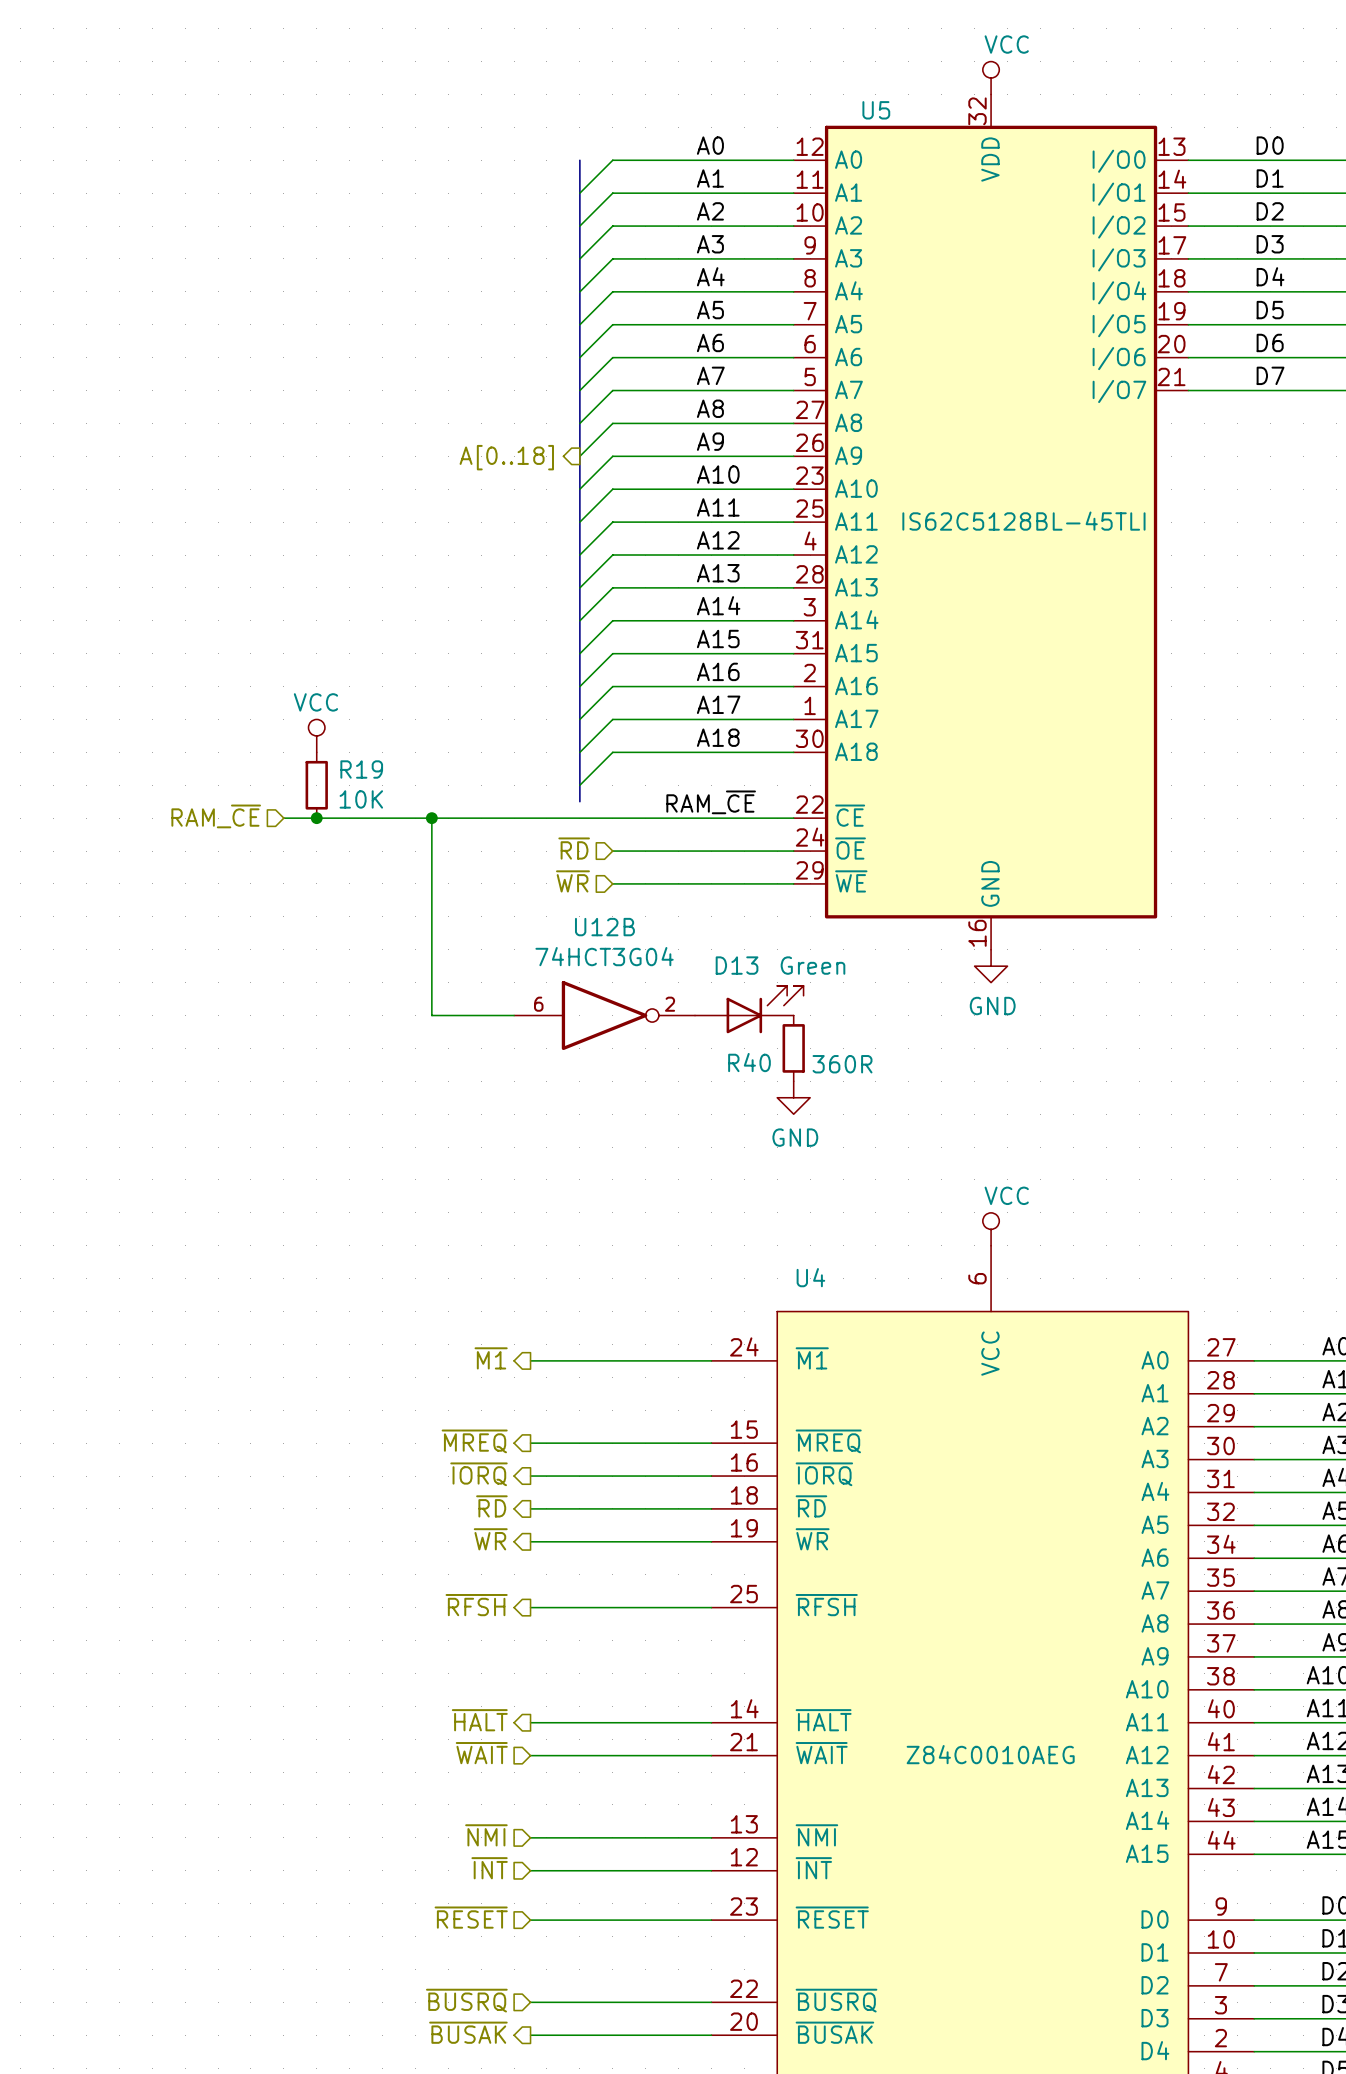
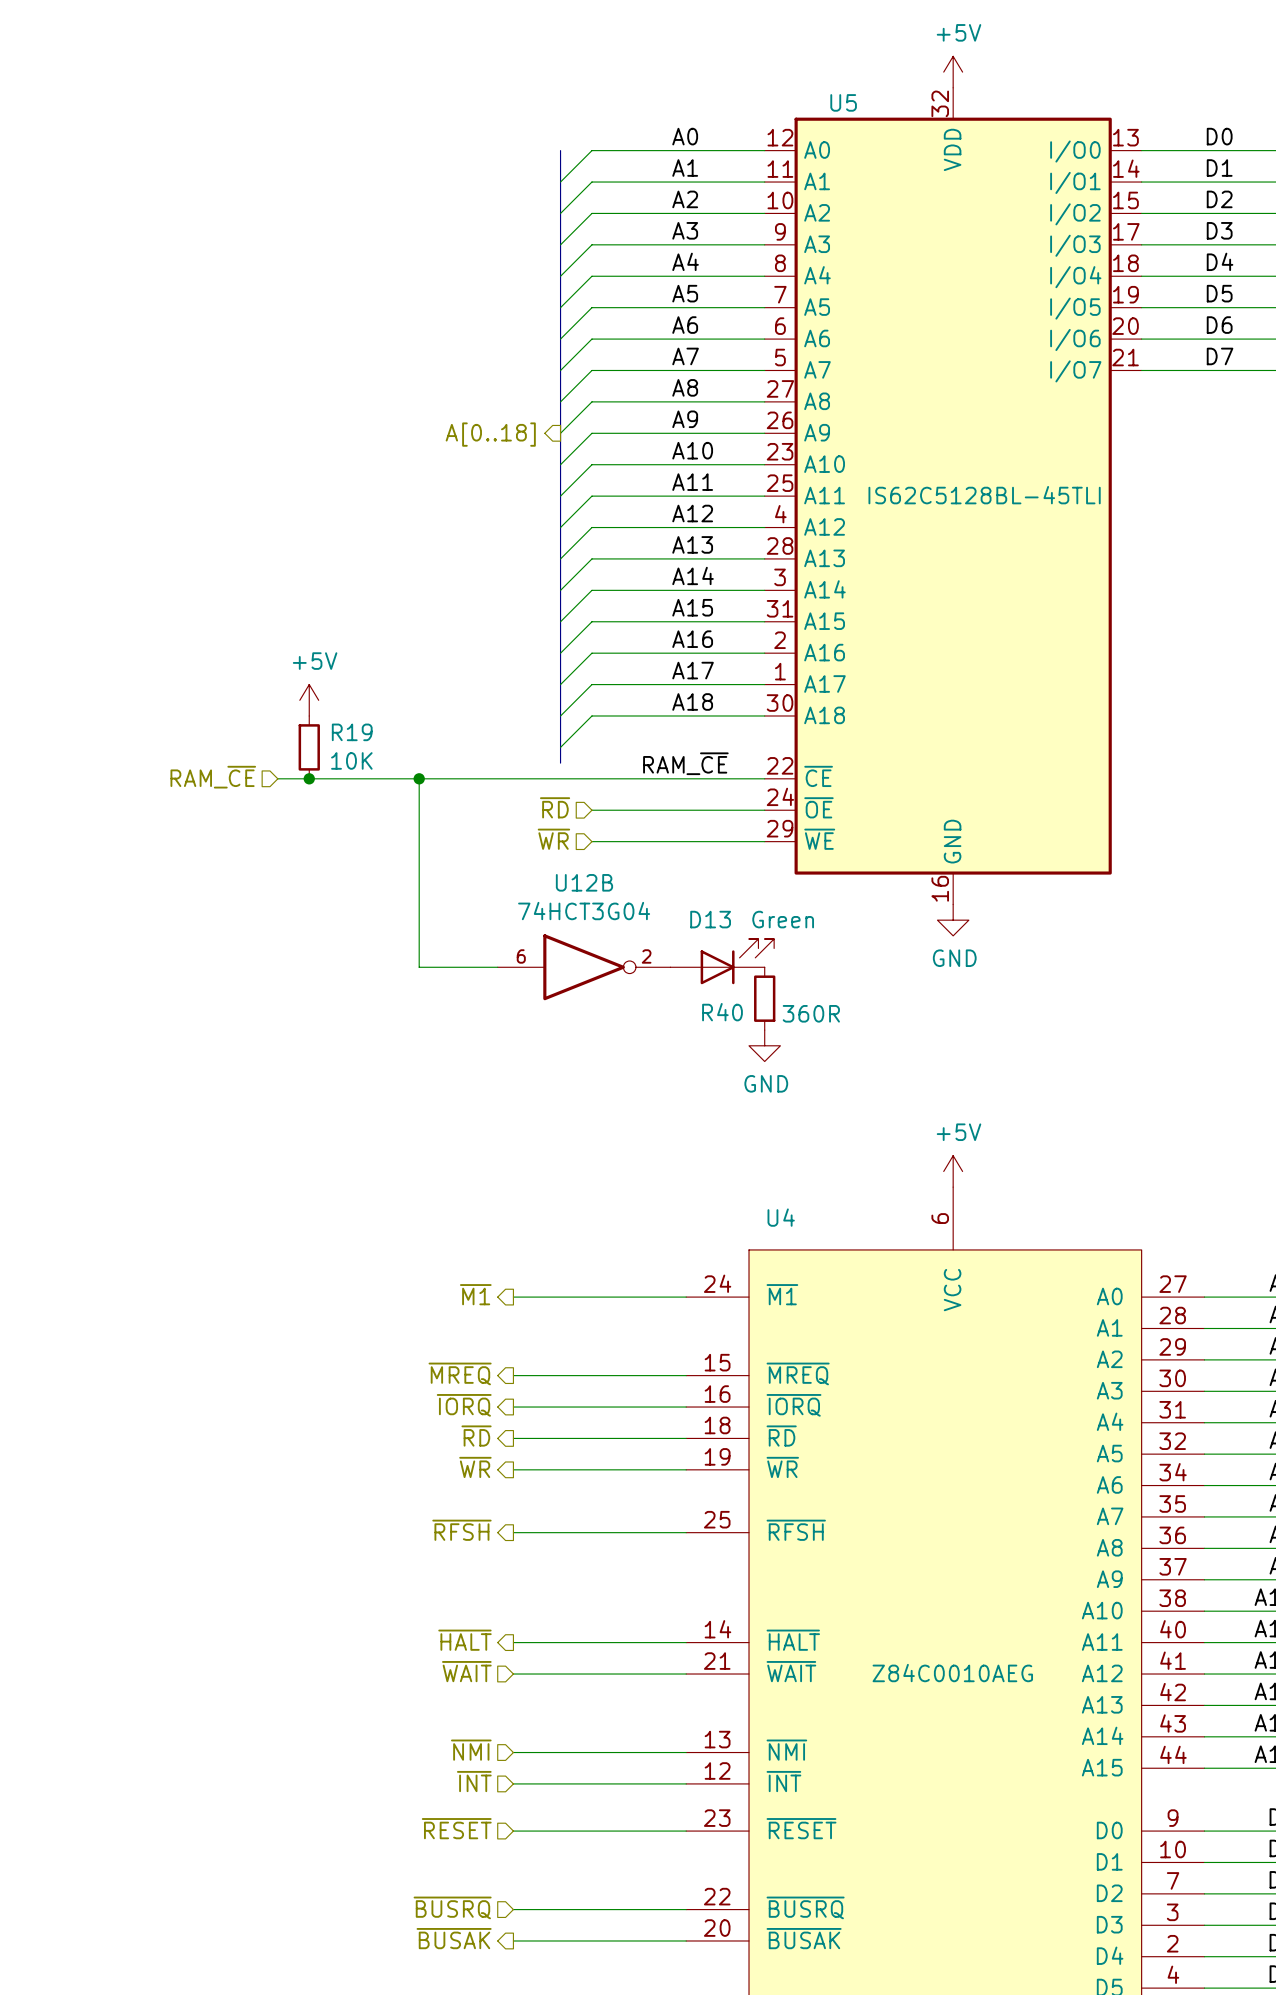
power symbol: VCC (991, 78) -> +5V (953, 72)
power symbol: VCC (316, 735) -> +5V (309, 700)
power symbol: VCC (991, 1229) -> +5V (953, 1171)

